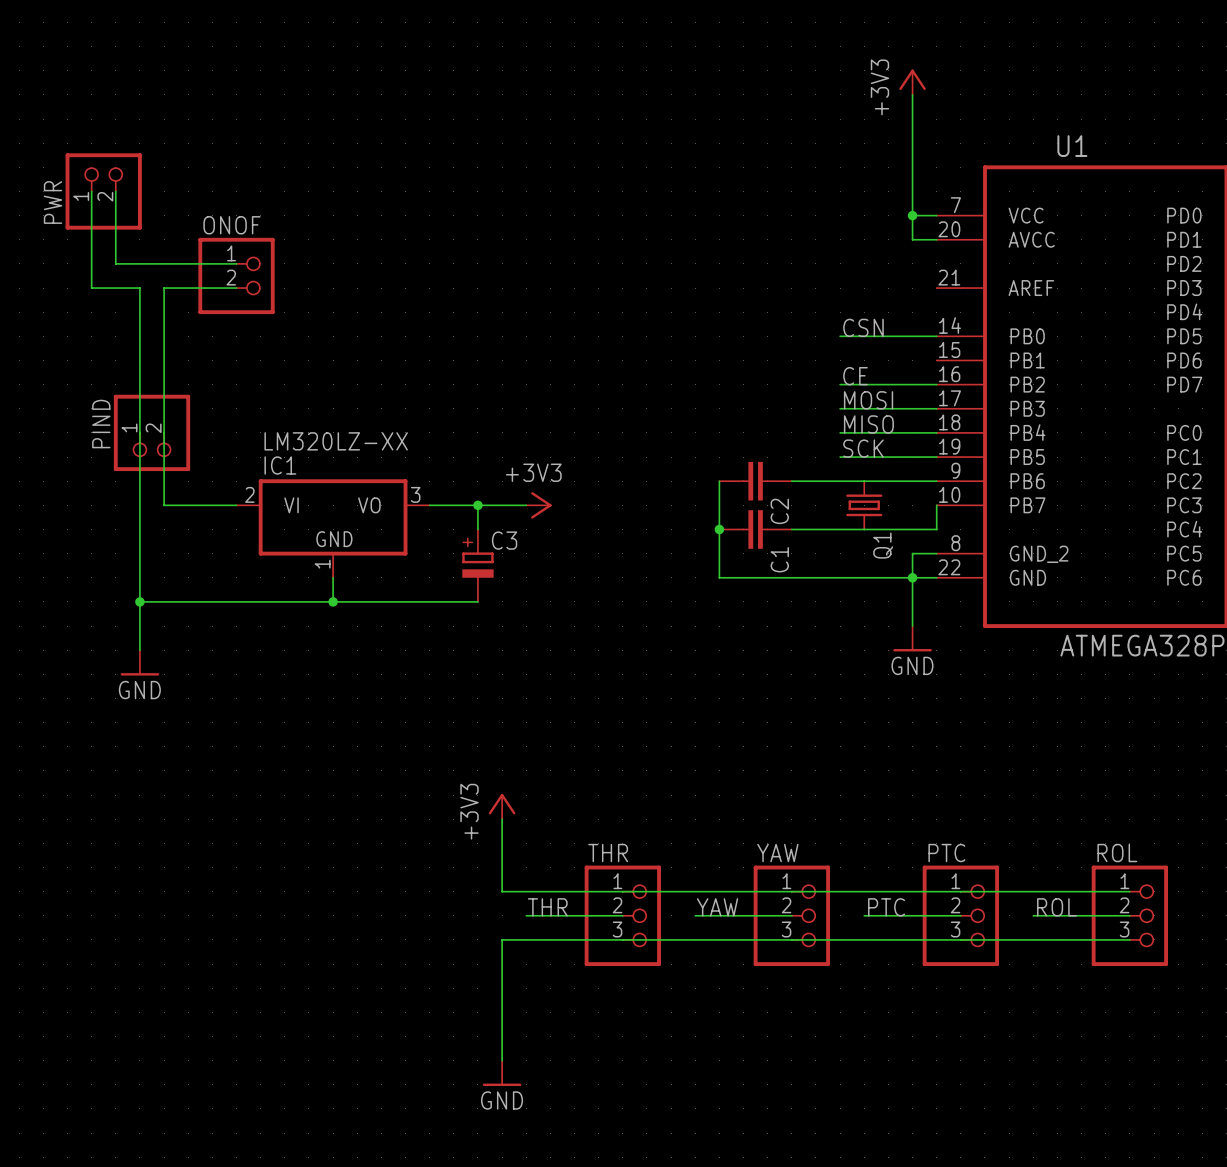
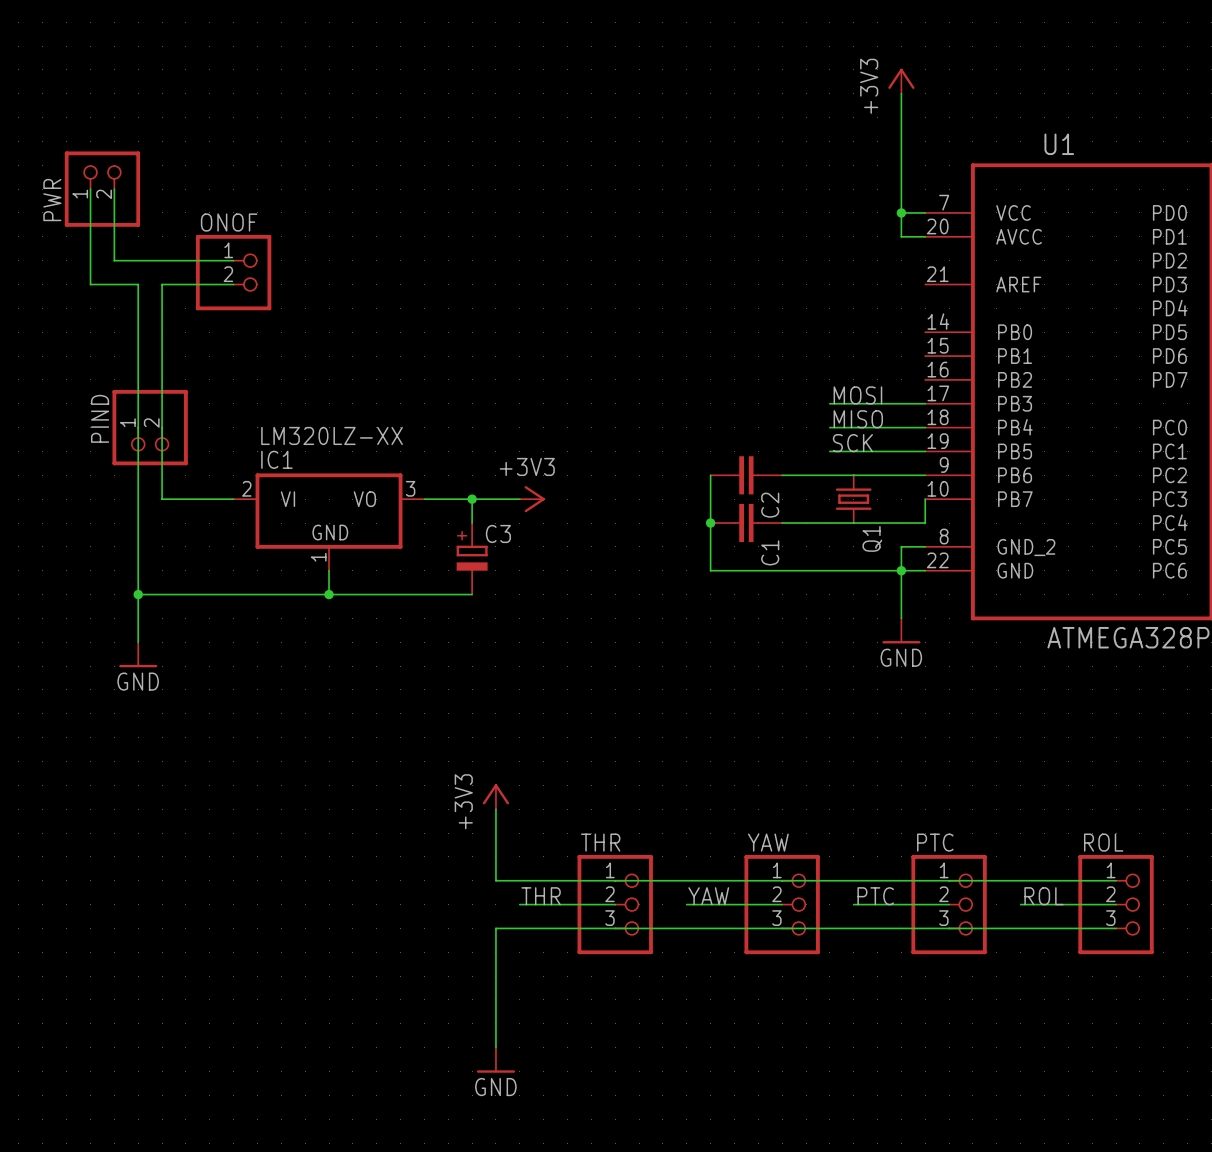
label: CSN (863, 327) -> none
wire: (840, 336) (936, 336) -> none
label: CE (855, 376) -> none
wire: (840, 384) (936, 384) -> none

